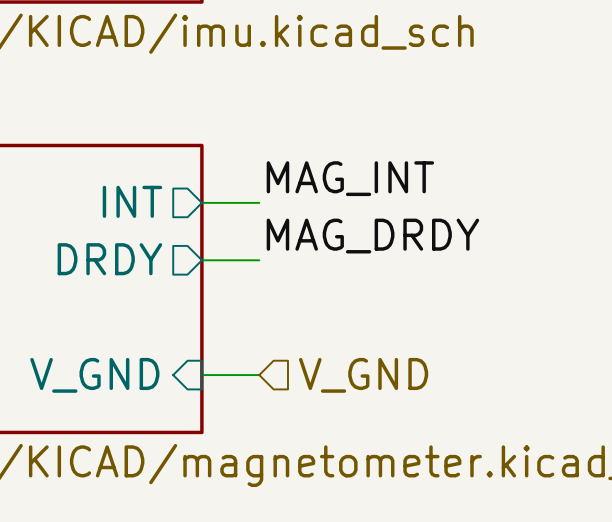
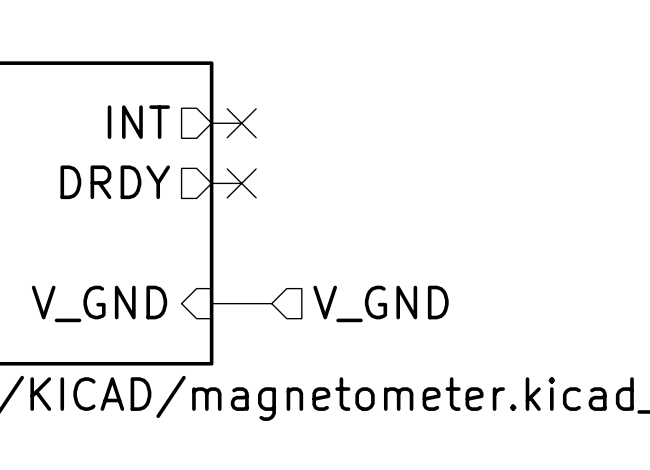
label: MAG_INT (350, 178) -> none
wire: (230, 202) (259, 202) -> none
no-connect mark: none -> (241, 123)
label: MAG_DRDY (372, 236) -> none
wire: (230, 260) (259, 260) -> none
no-connect mark: none -> (241, 183)

